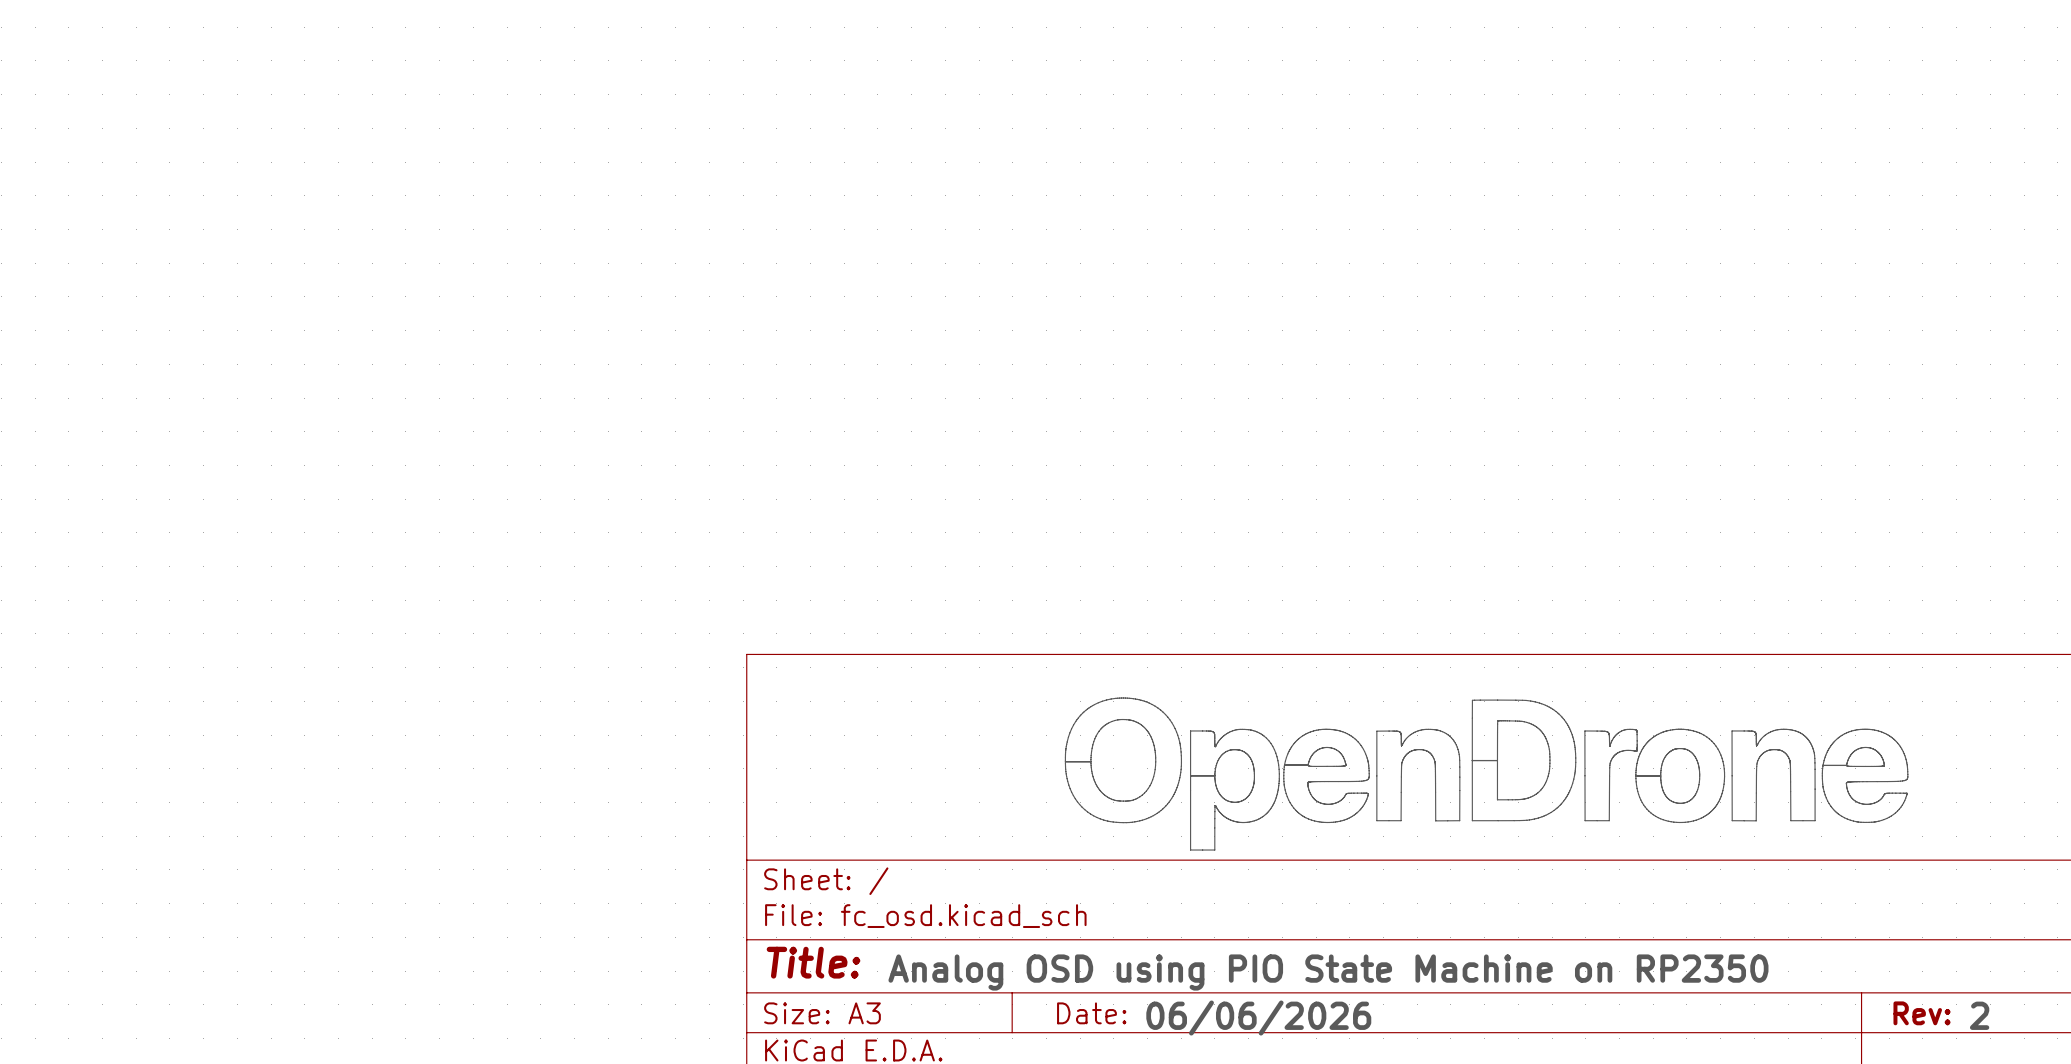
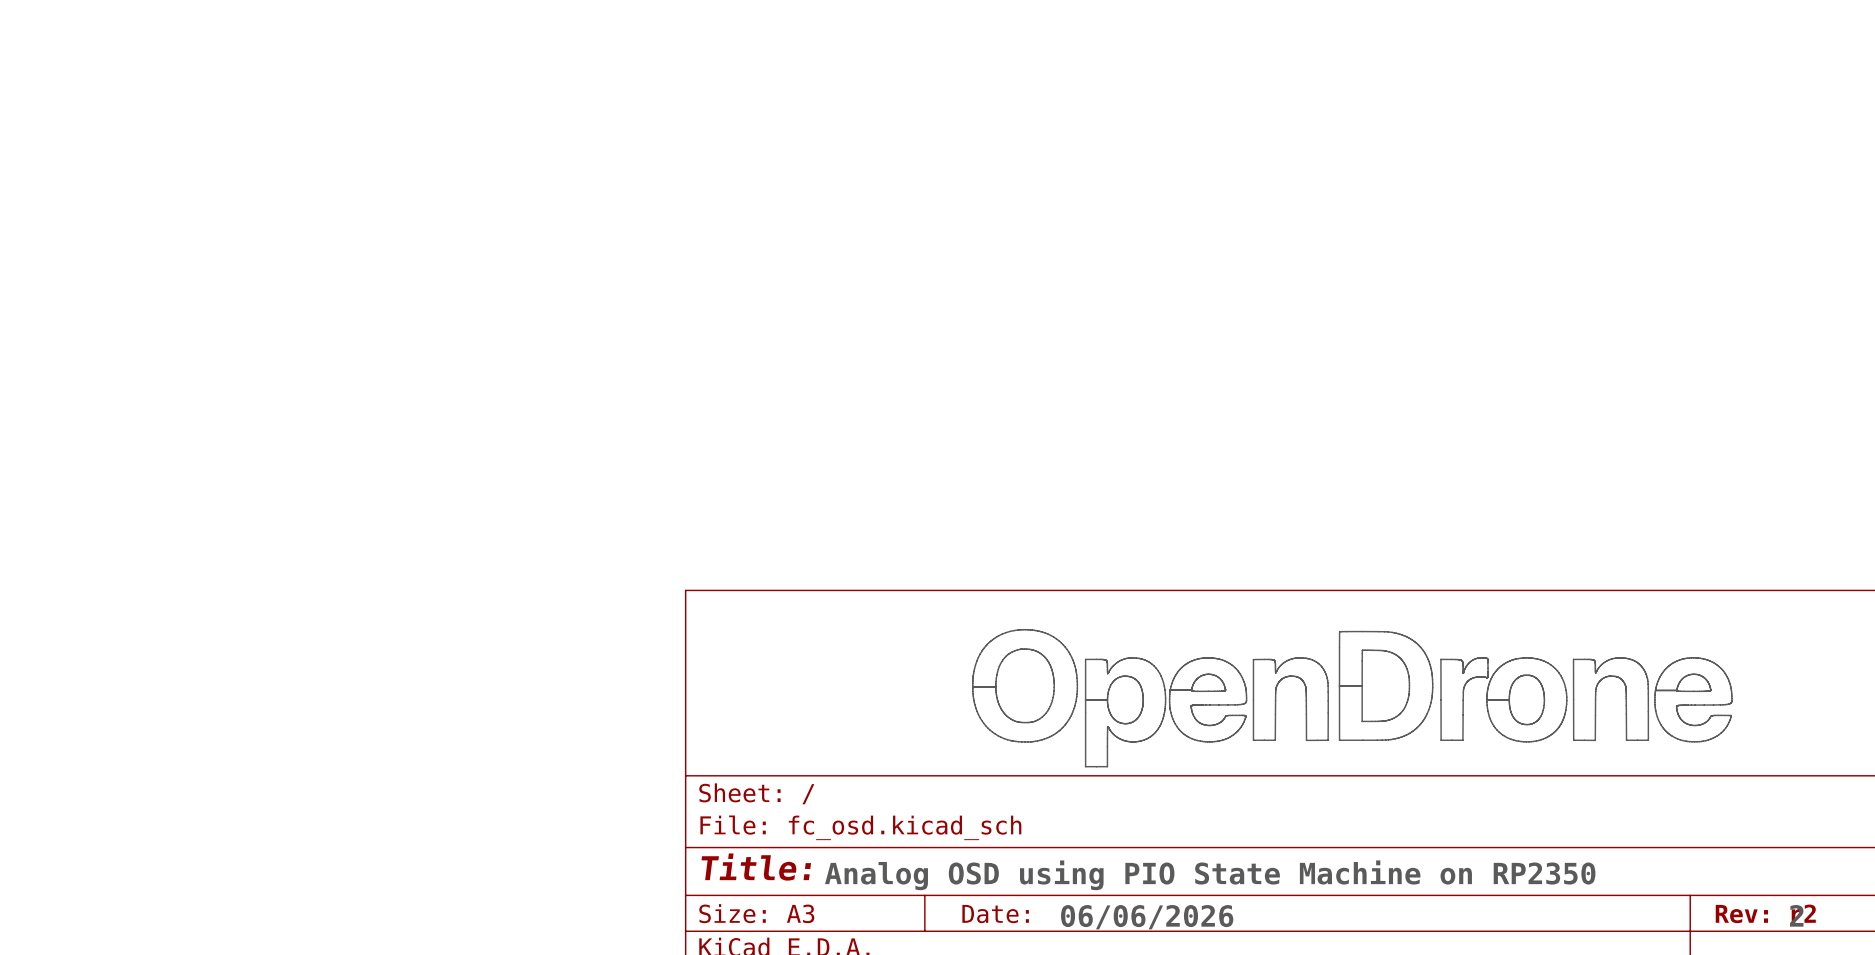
title block: Rev: (1922, 1013) -> Rev: r2 (1765, 913)

